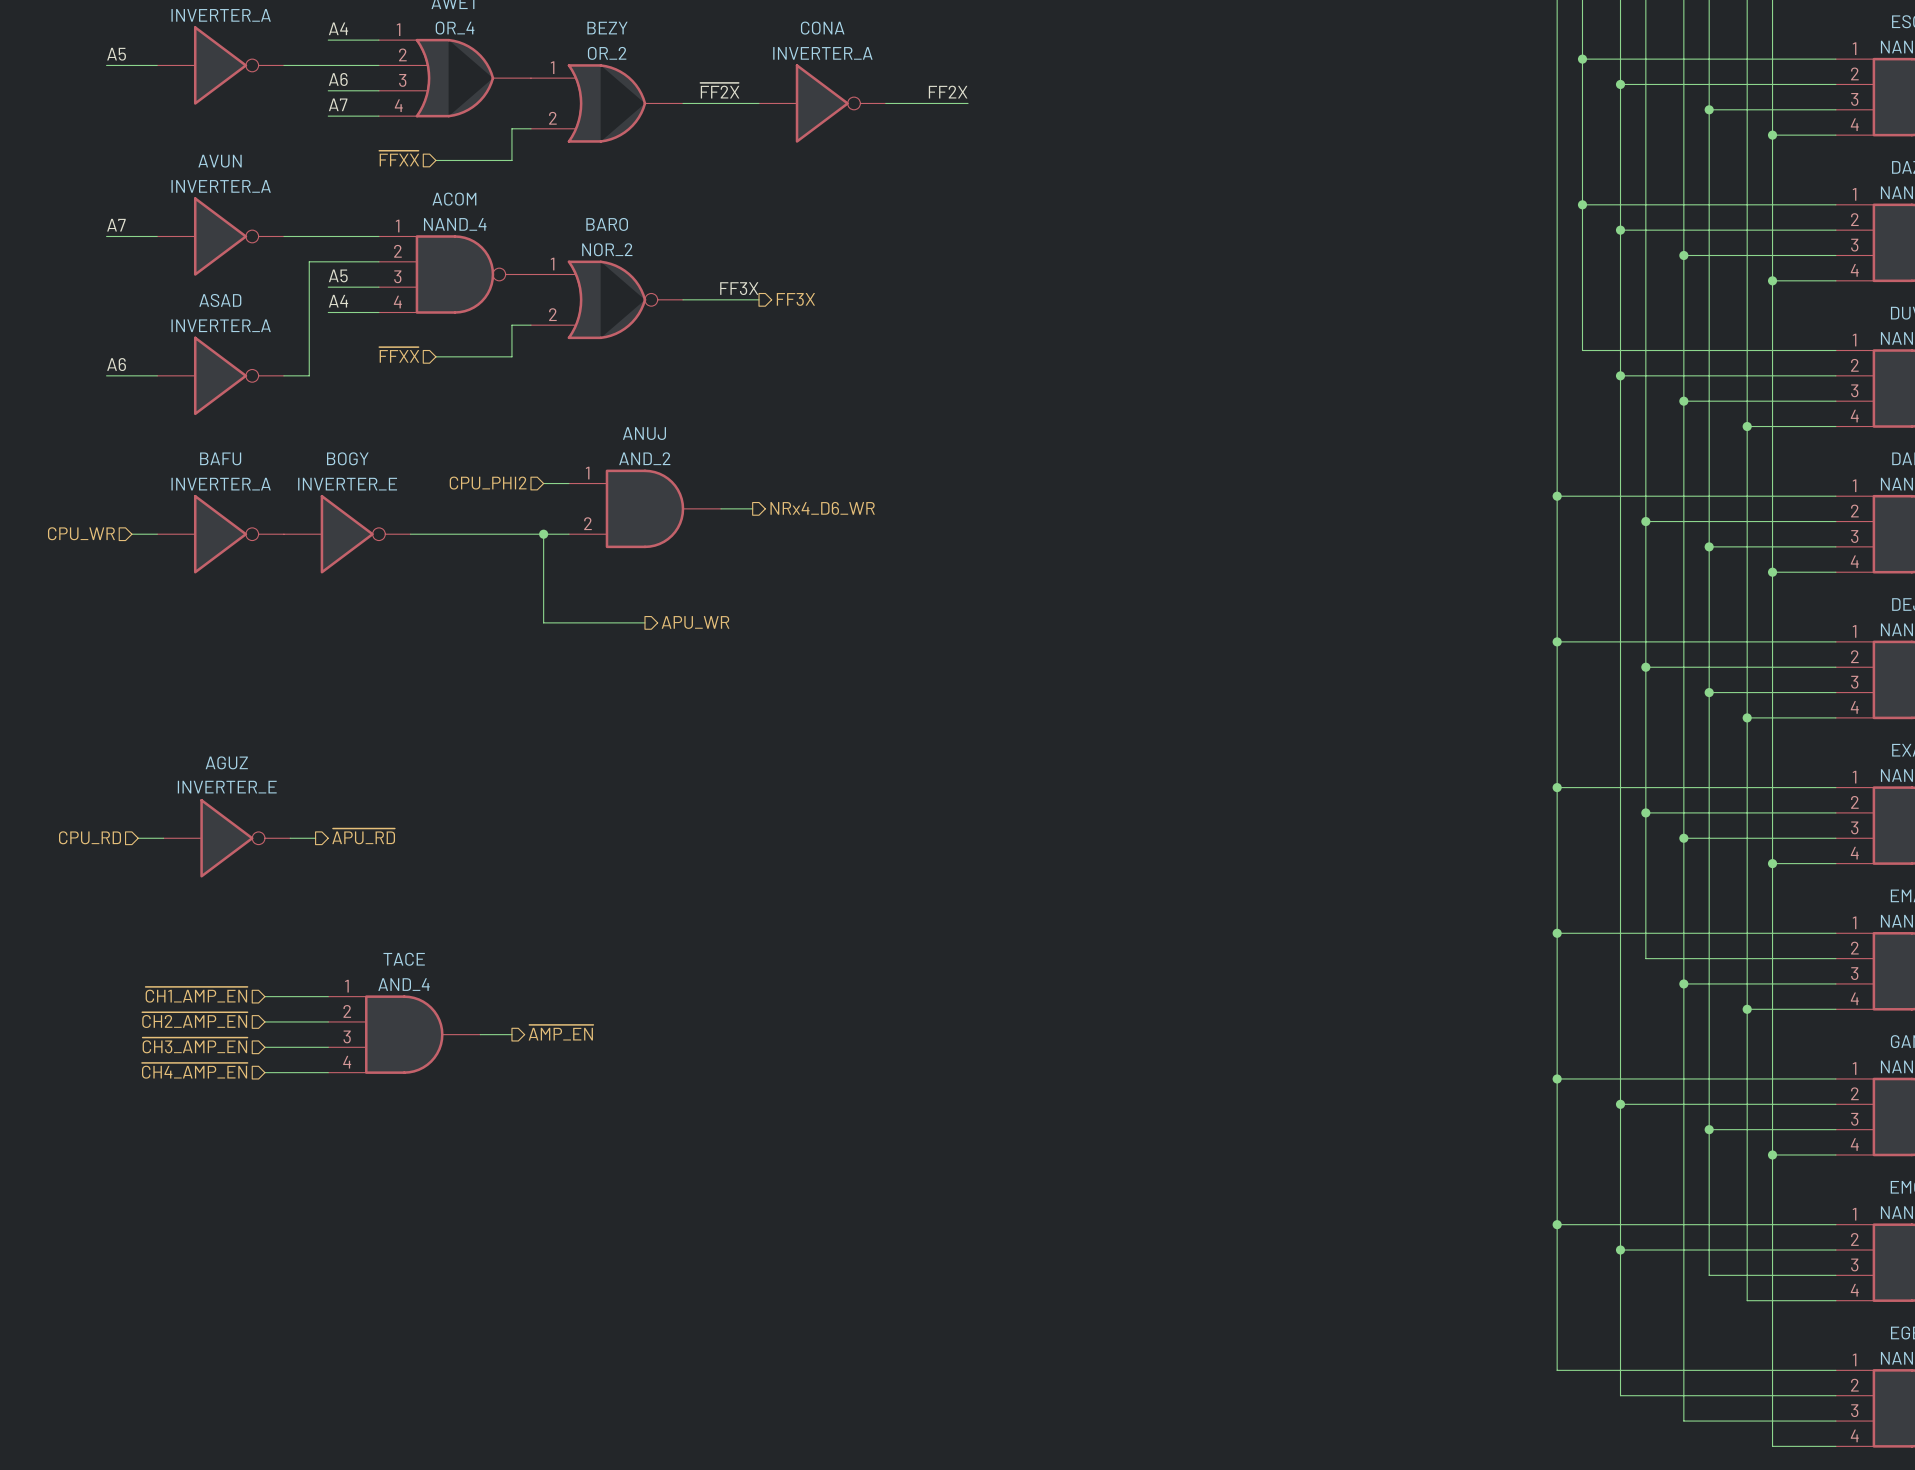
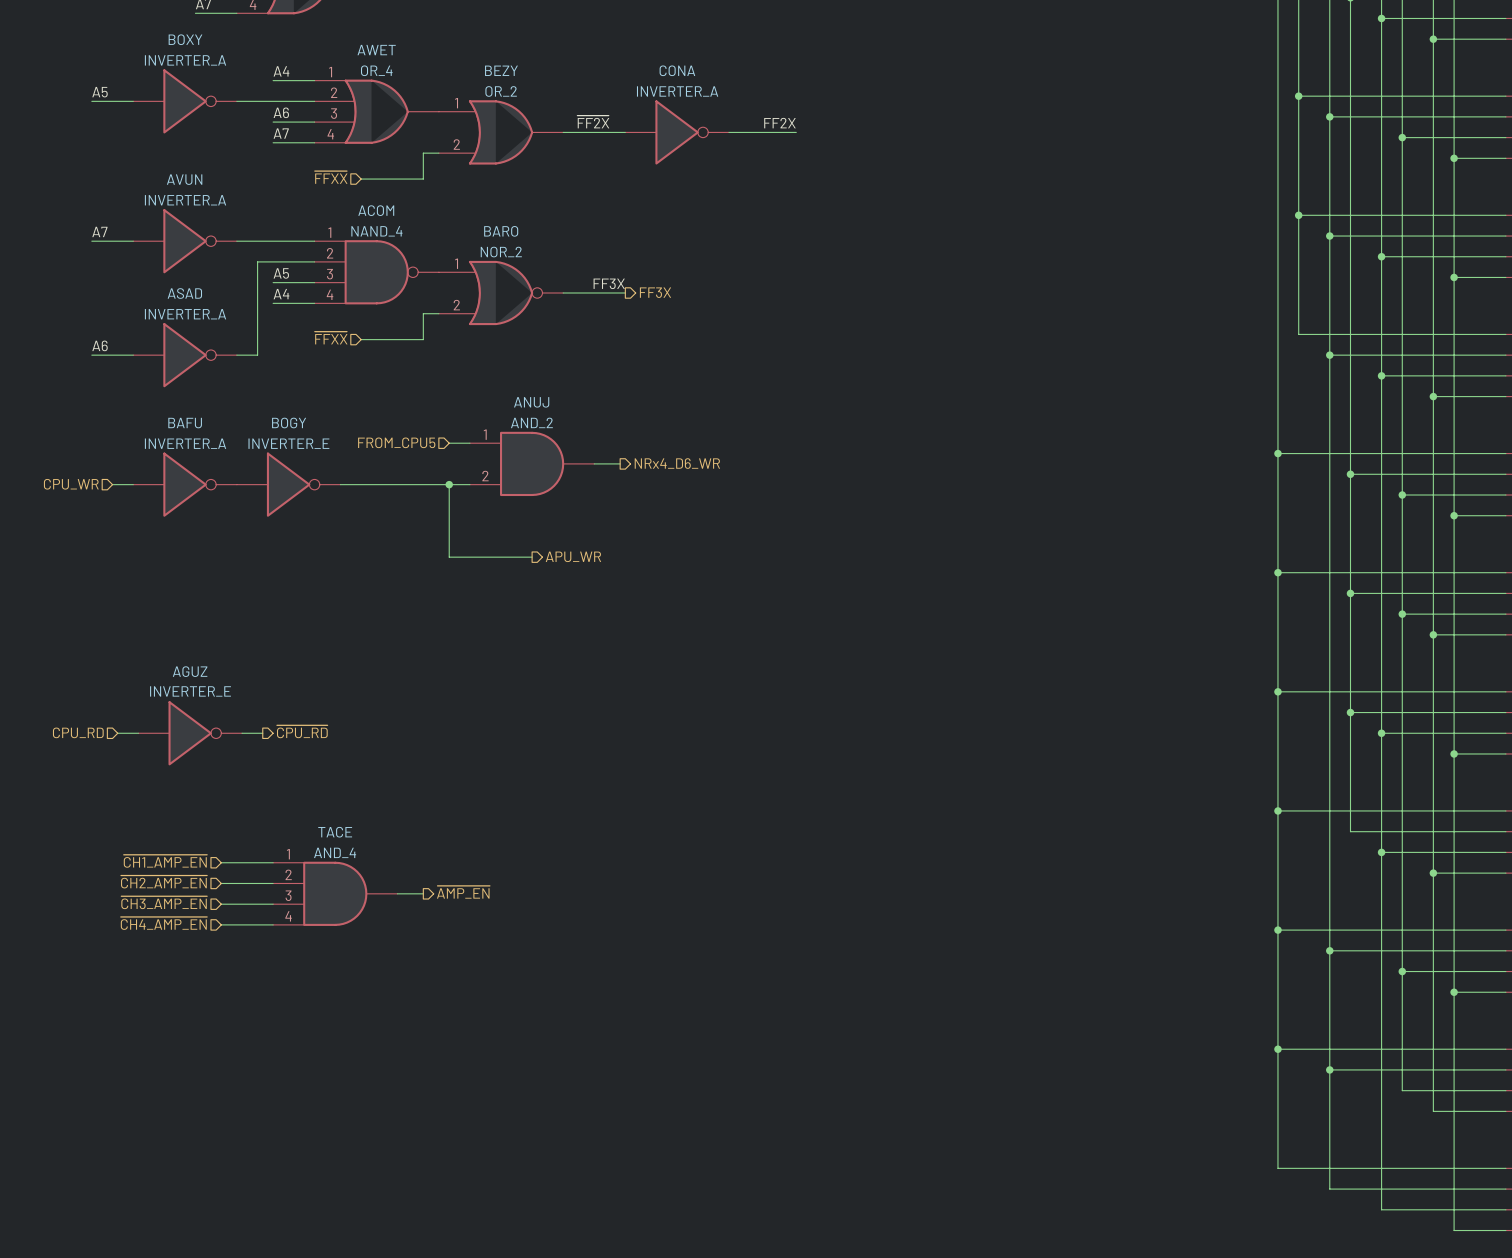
hierarchical label: CPU_PHI2 (488, 483) -> FROM_CPU5 (396, 442)
hierarchical label: ~{APU_RD} (363, 836) -> ~{CPU_RD} (302, 731)

